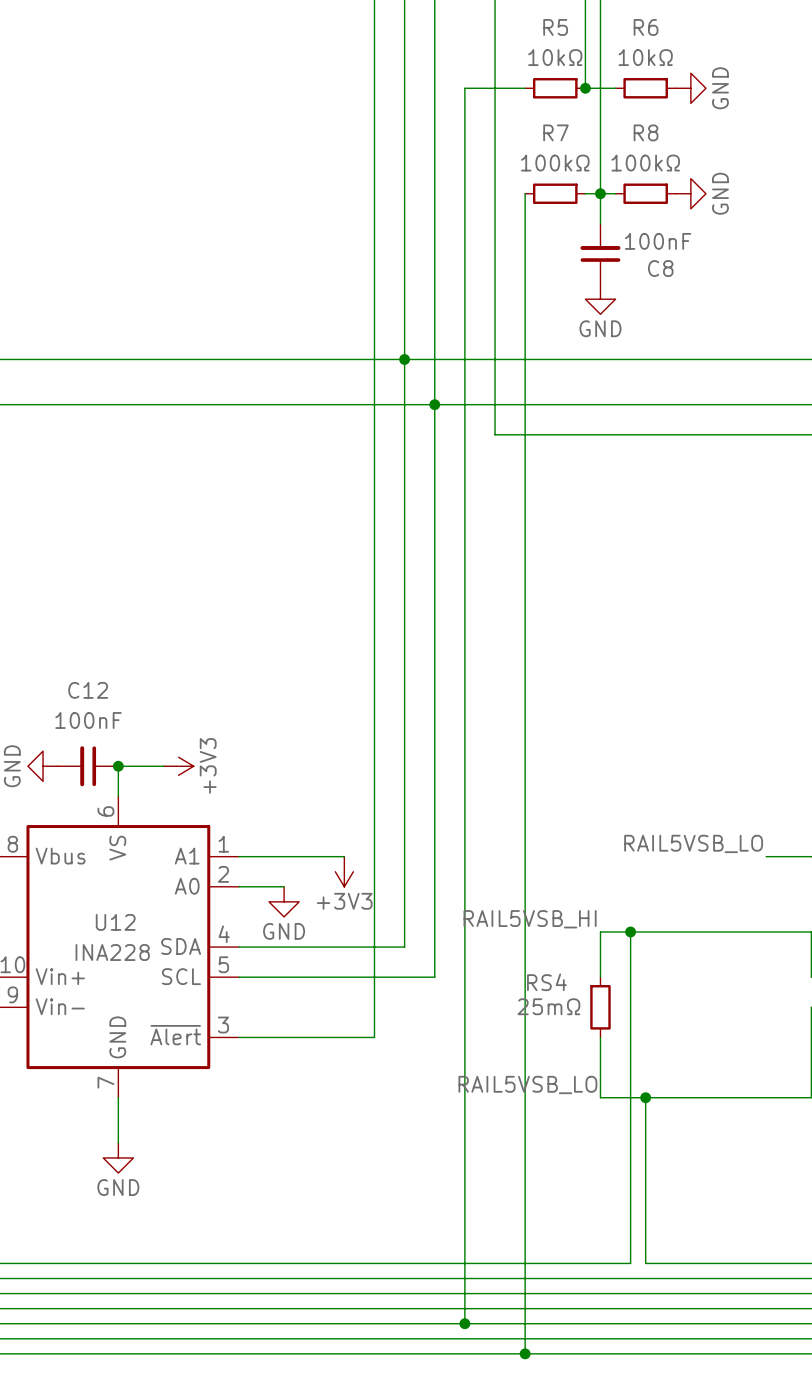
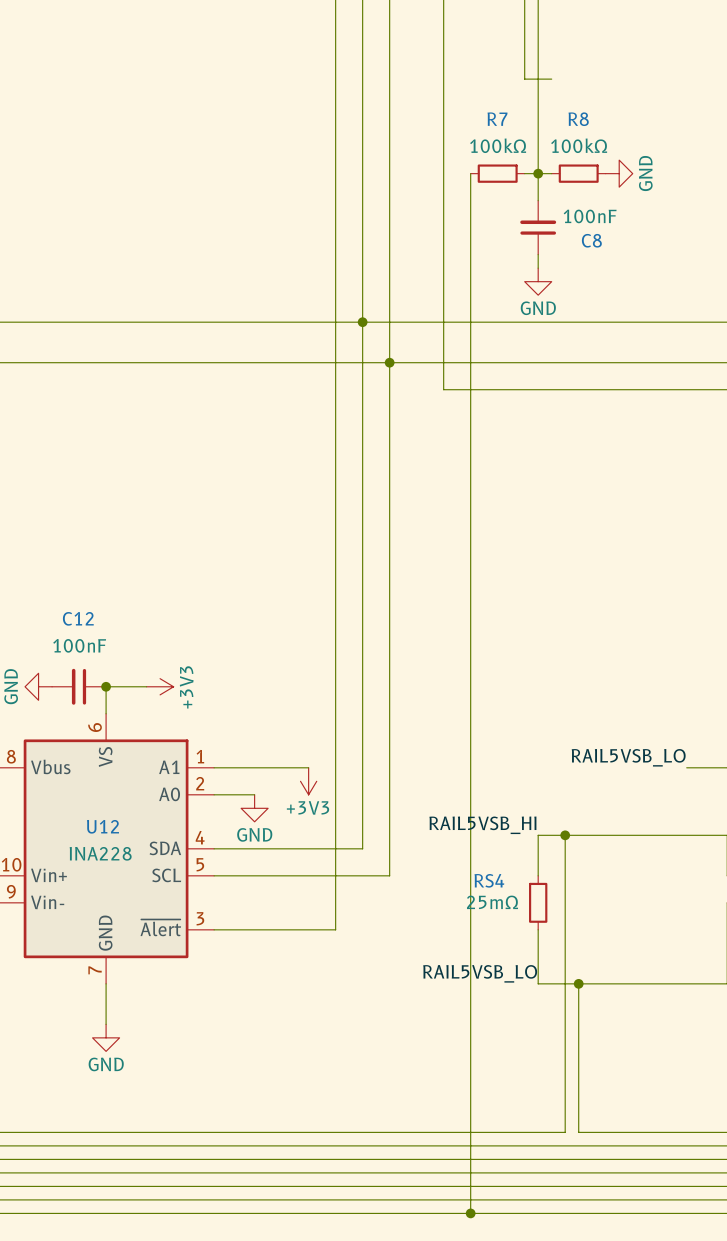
wire: (525, 88) (464, 88) (464, 1323) -> none
R5: 10kΩ (555, 88) -> none
junction: (585, 88) -> none
R6: 10kΩ (645, 88) -> none
power symbol: GND (690, 88) -> none
power symbol position: GND (600, 299) -> GND (538, 281)
junction: (464, 1323) -> none

